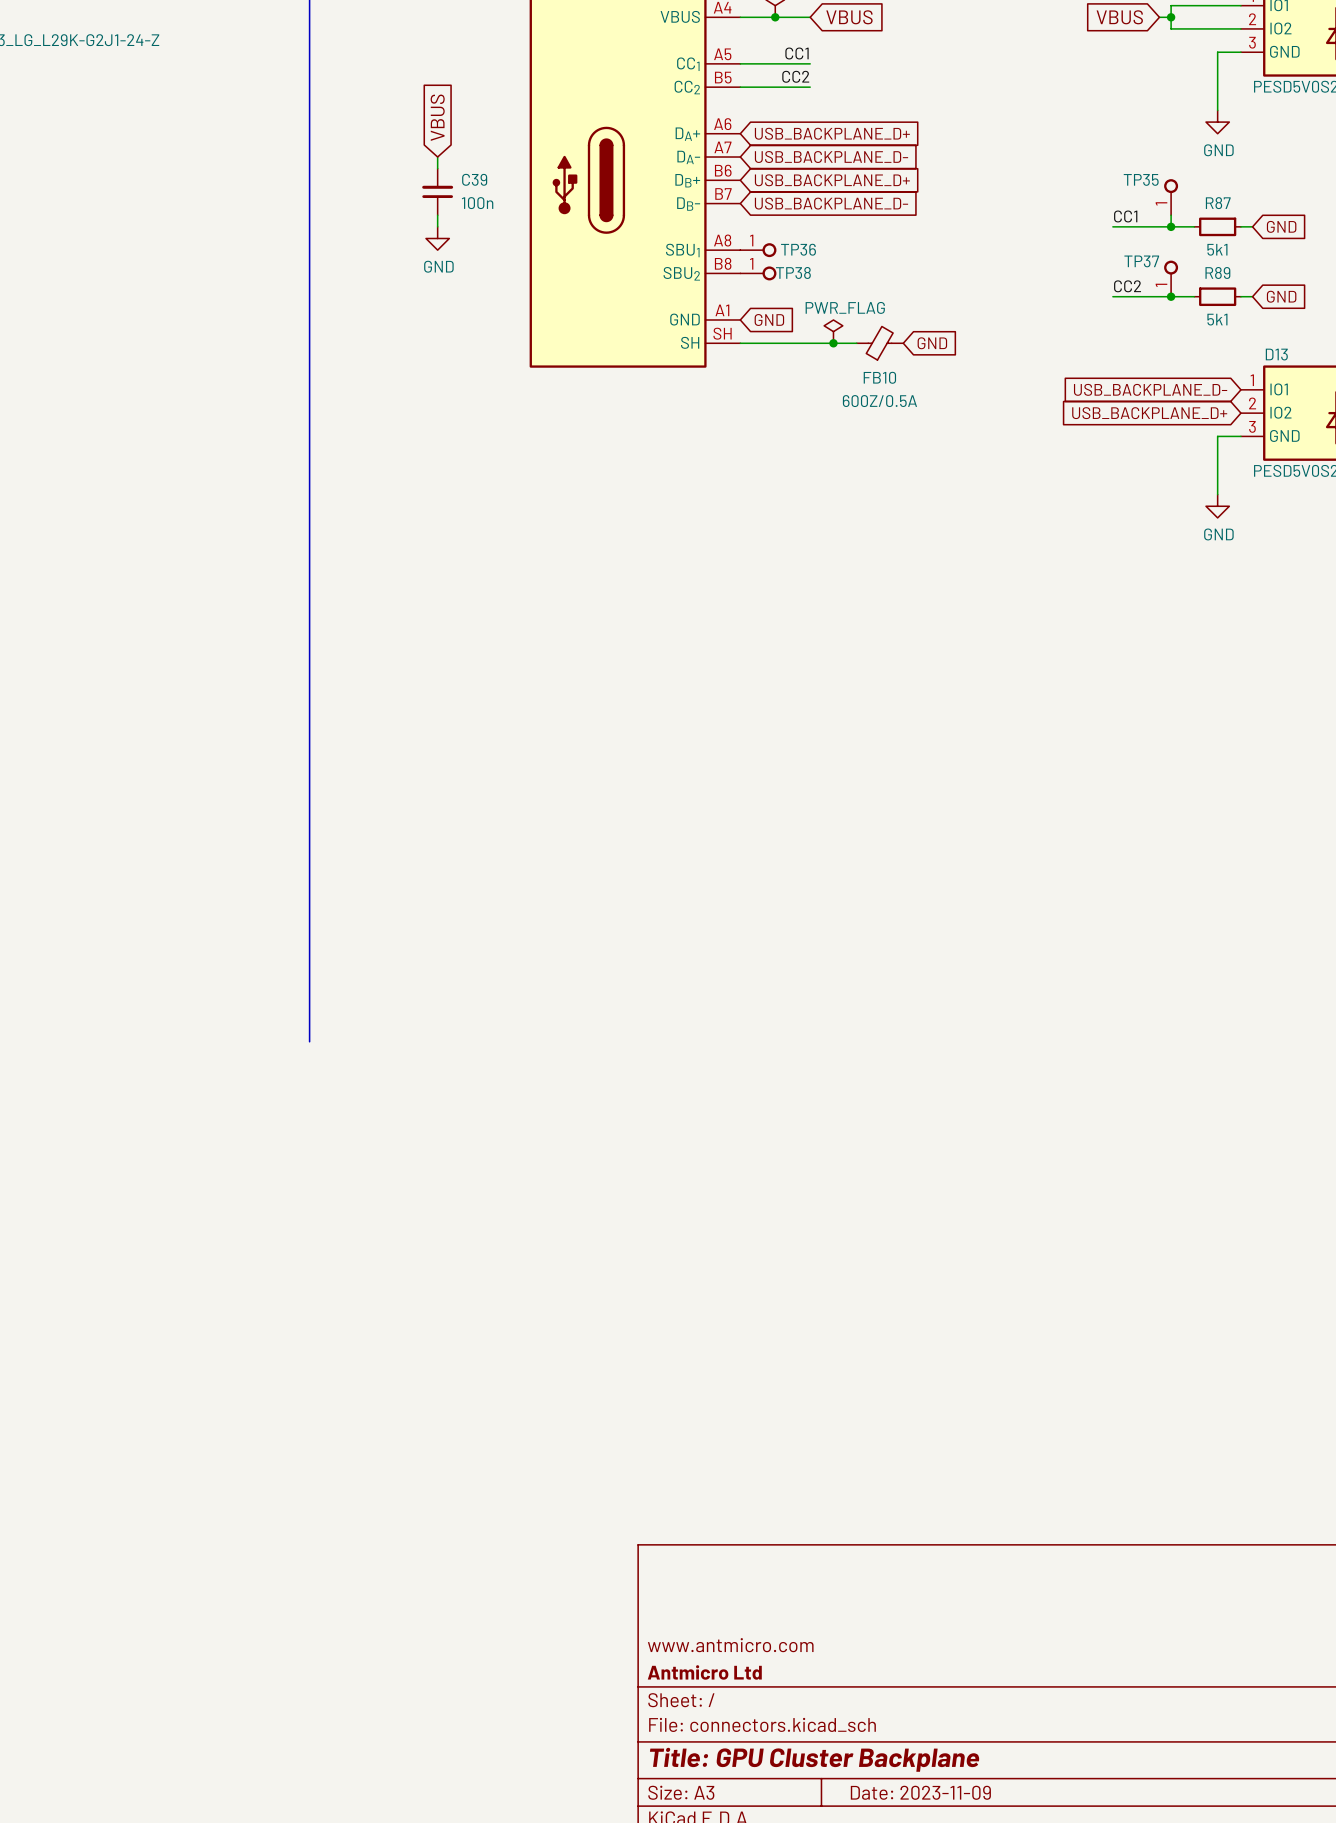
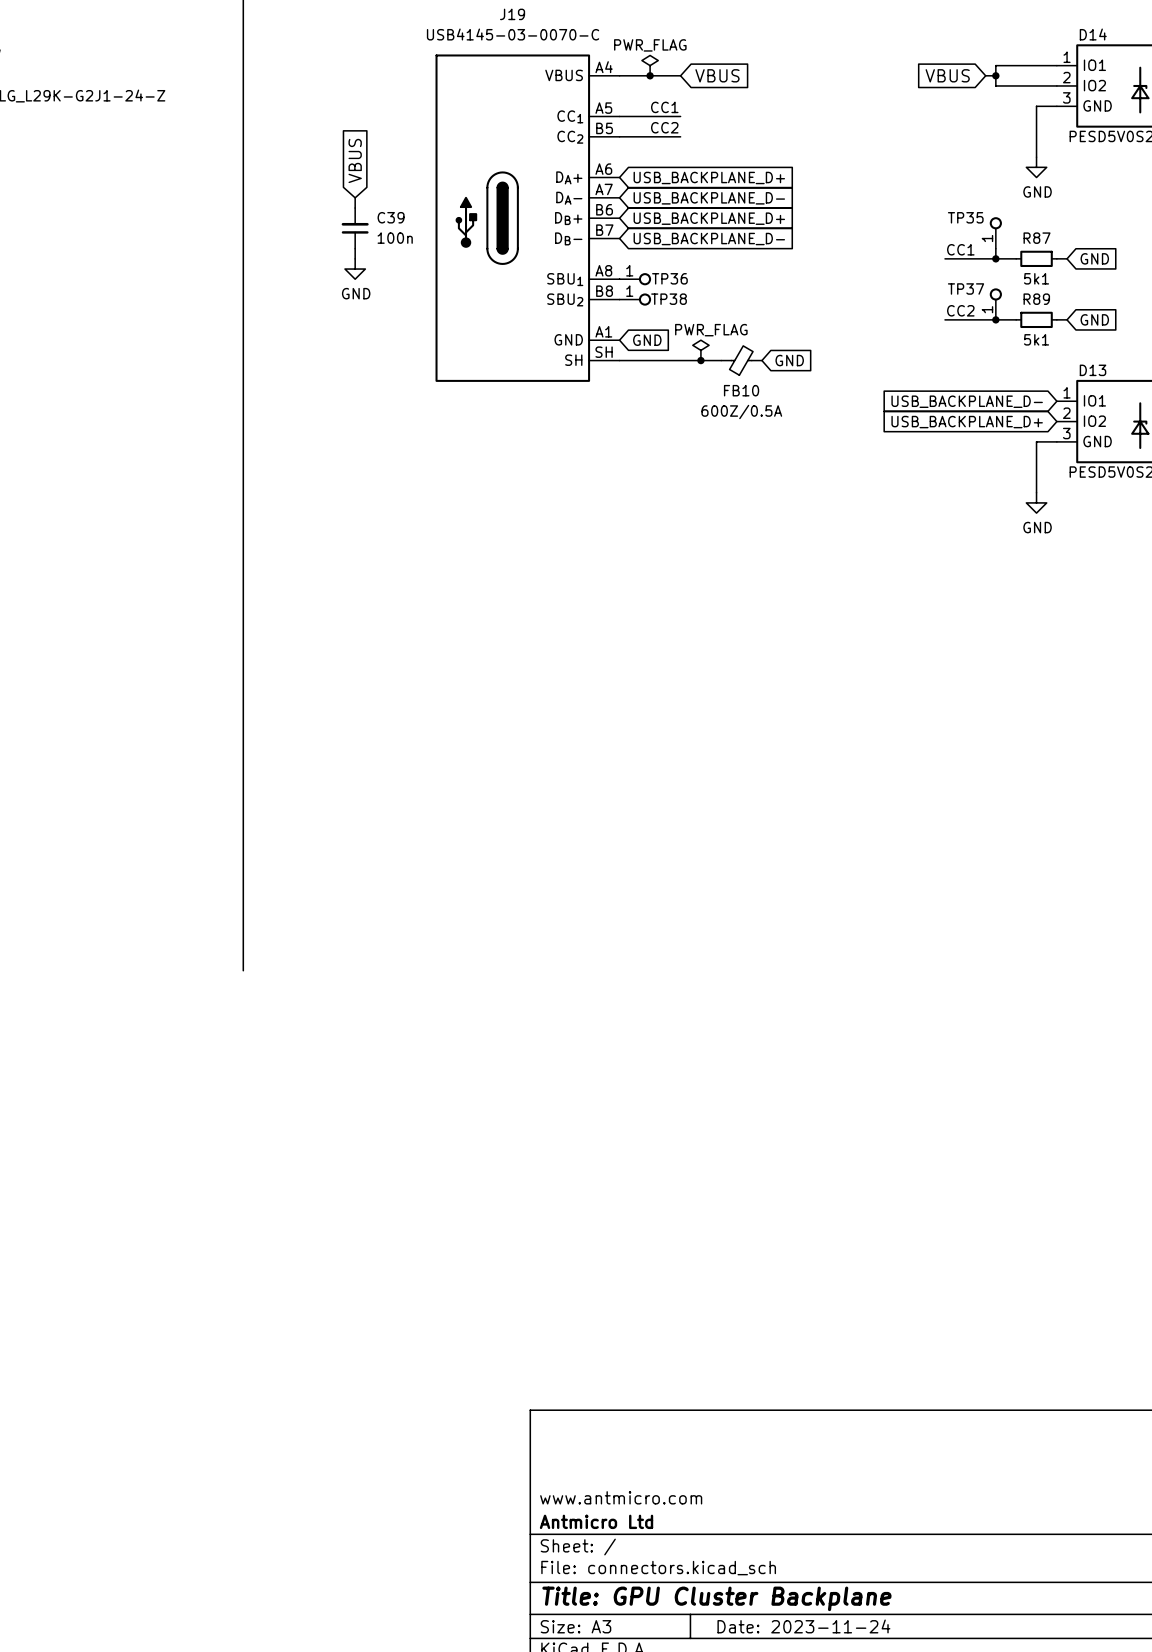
title block: Date: 2023-11-09 (920, 1792) -> Date: 2023-11-24 (803, 1626)

